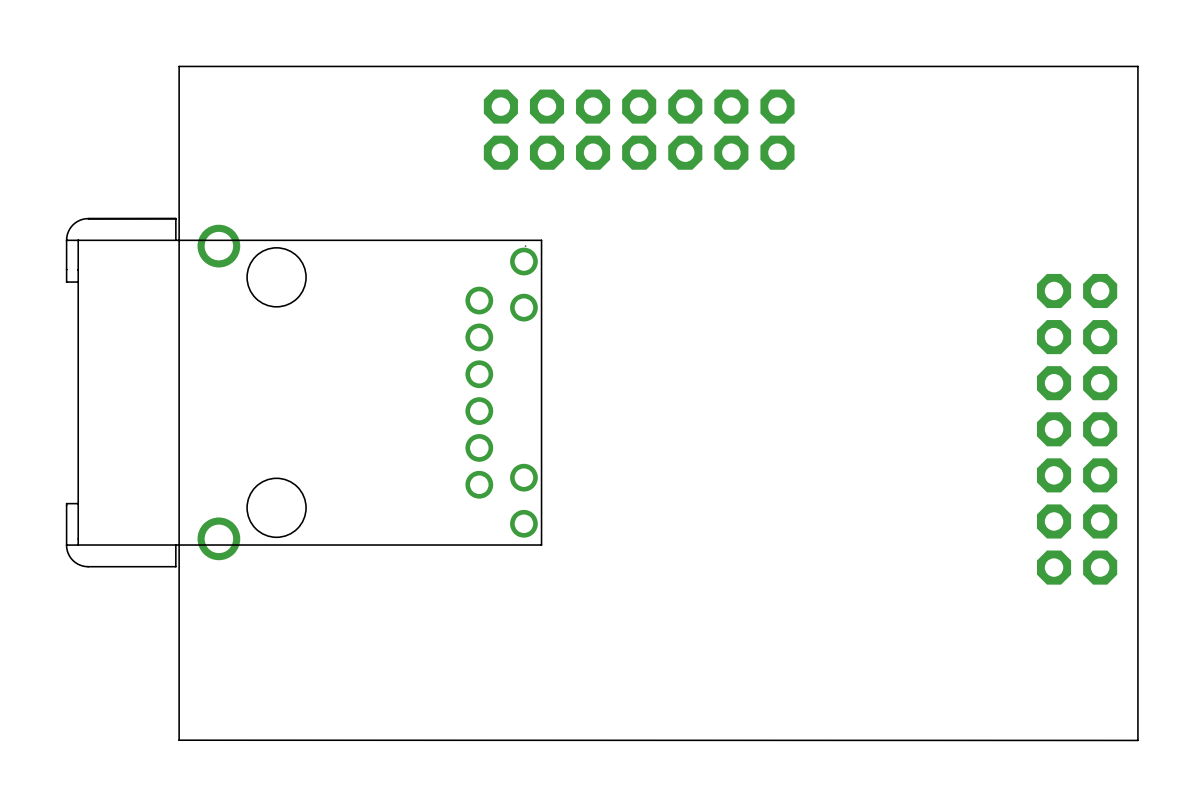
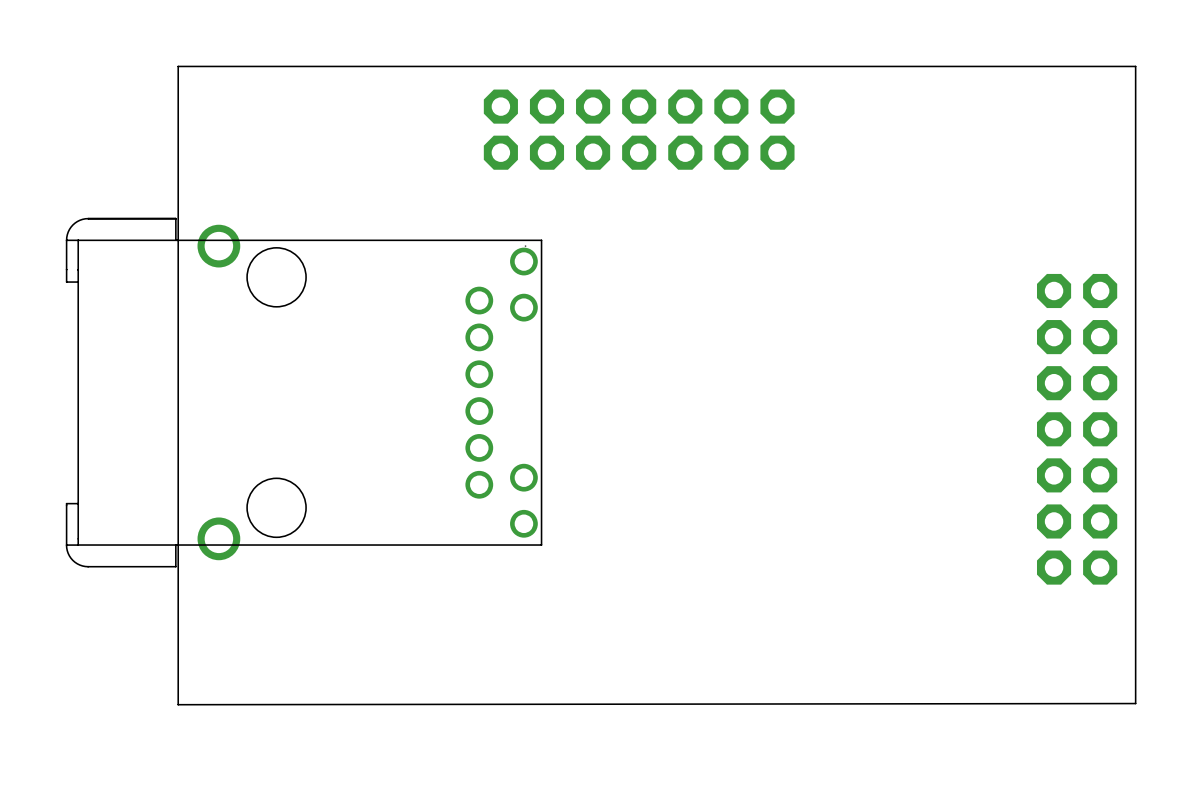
board edge: (179, 66) (179, 740) (1137, 740) (1137, 66) (1135, 66) -> (179, 66) (178, 704) (1135, 703) (1135, 66)

